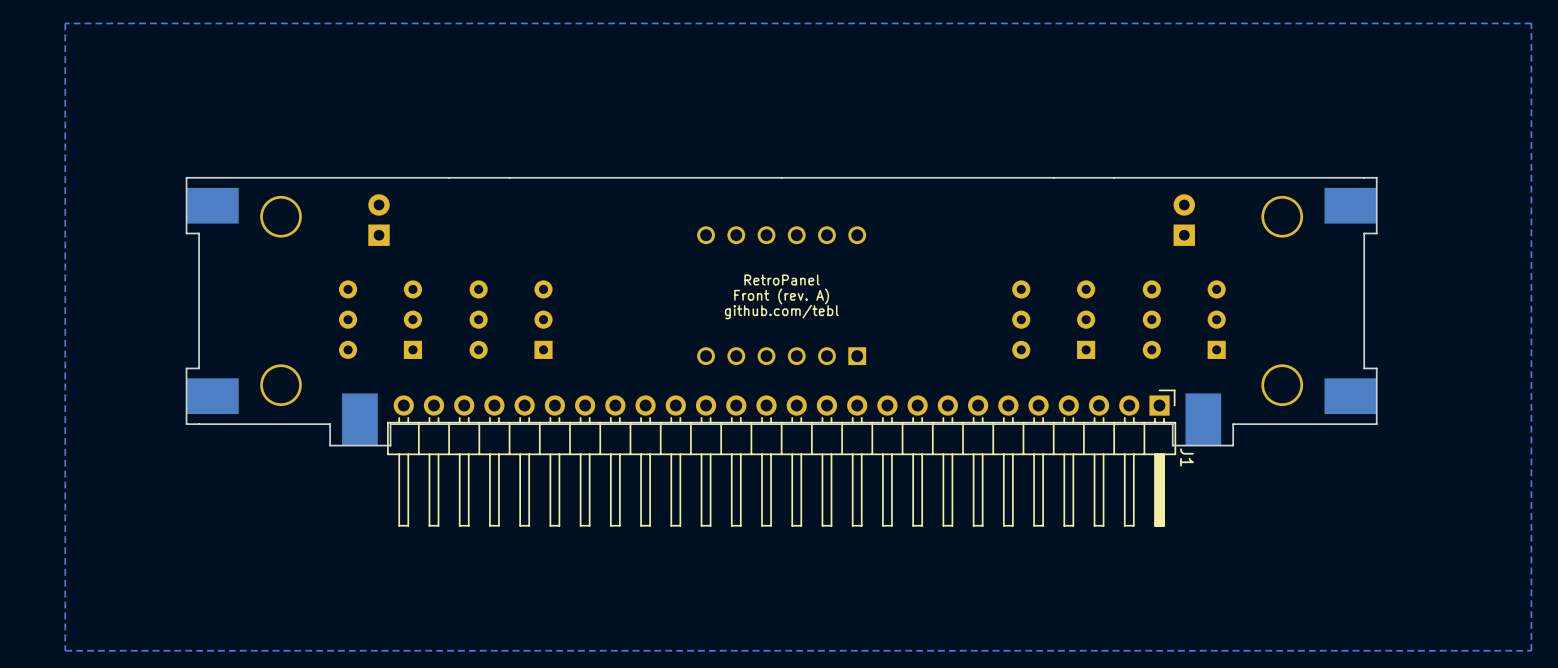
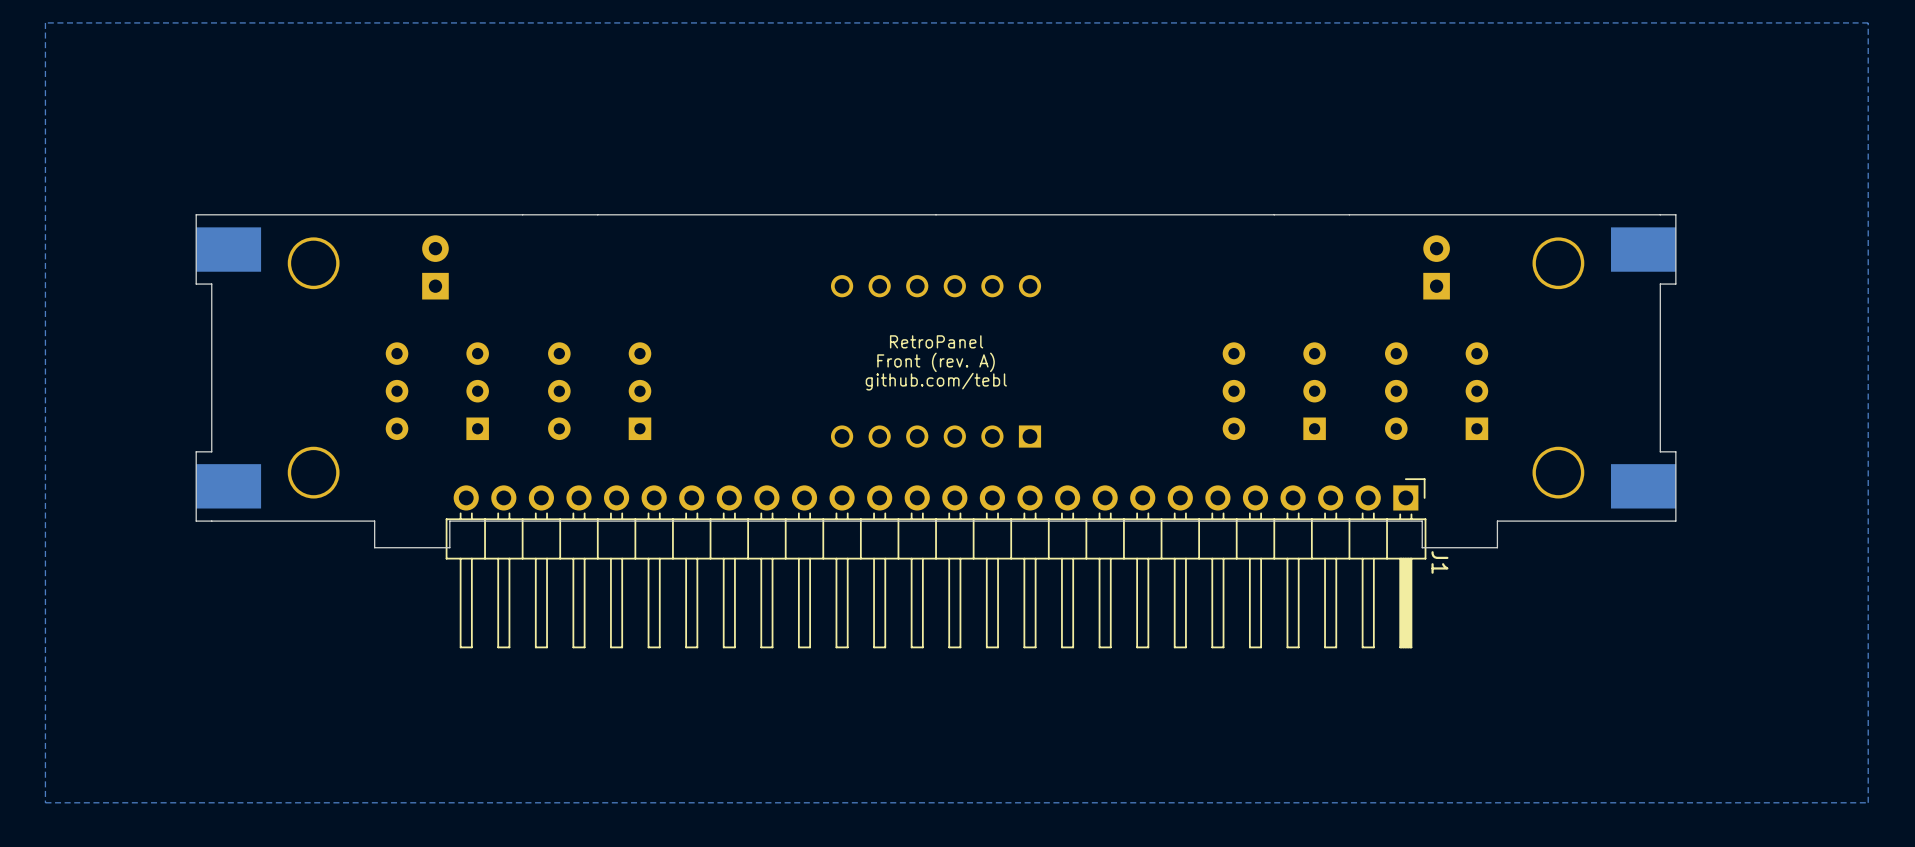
part: (359, 419) -> none
part: (1203, 419) -> none

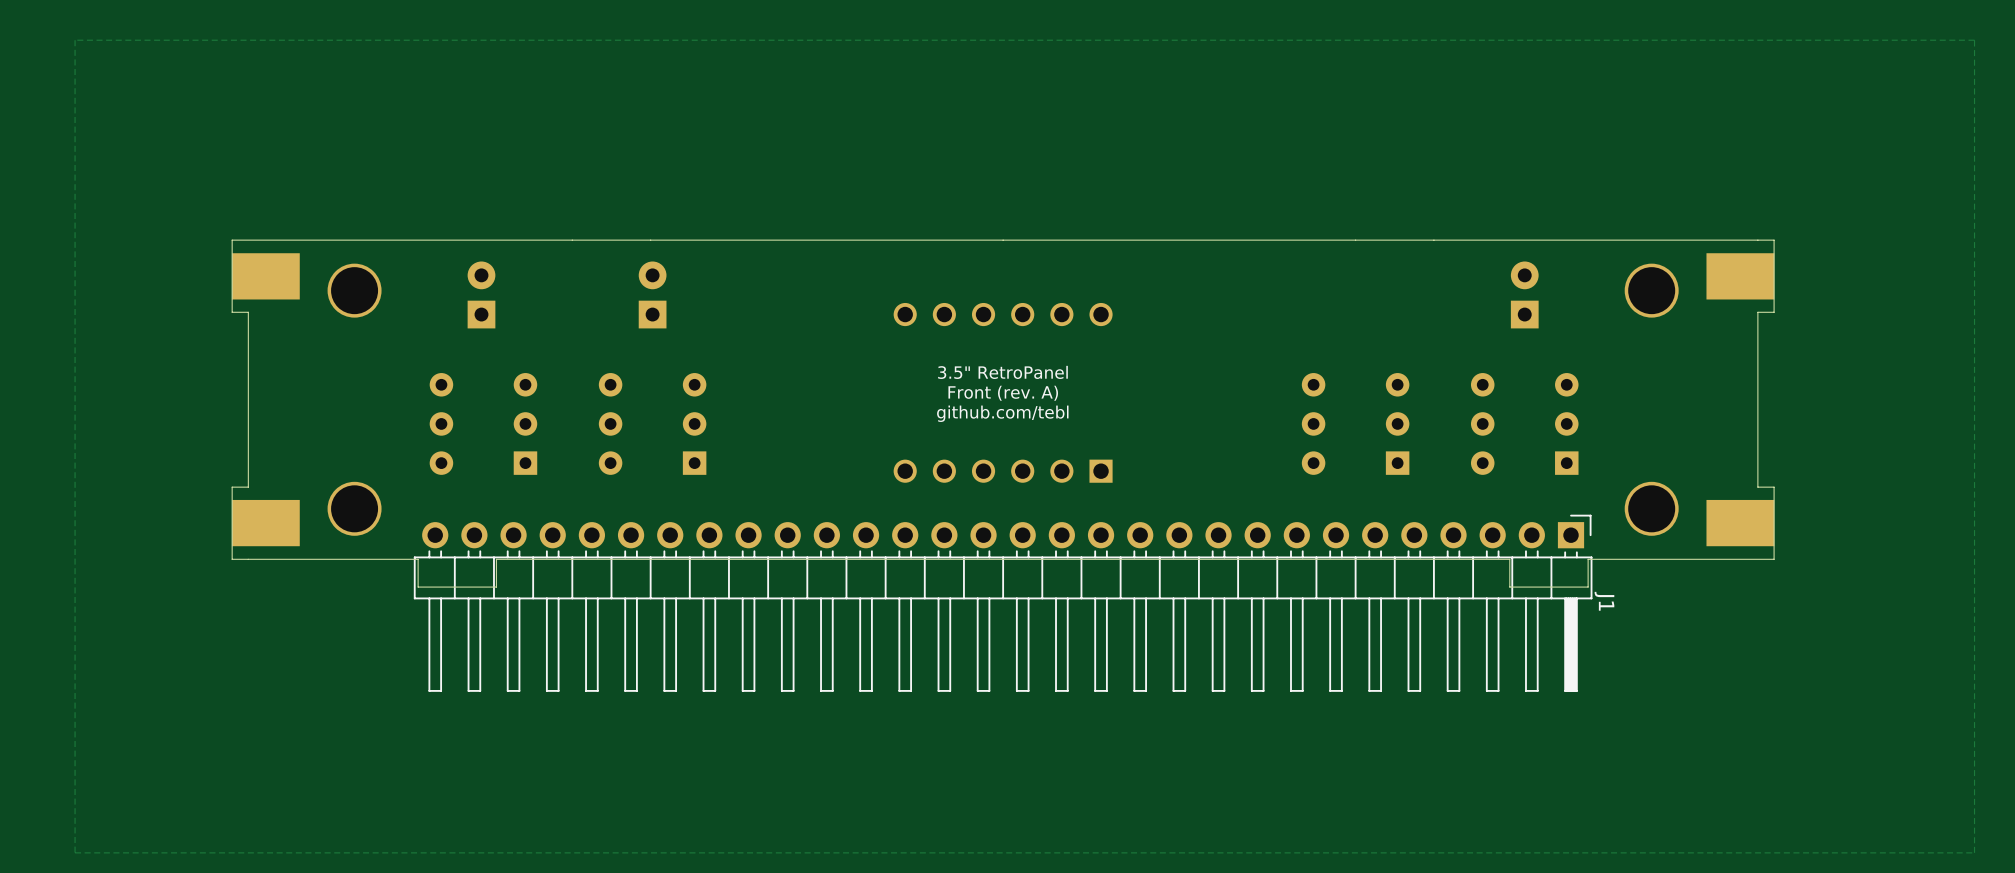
part: none -> (652, 294)
text: RetroPanel (936, 341) -> 3.5" RetroPanel (1002, 372)
J1 footprint: [445, 478, 1427, 649] -> [413, 514, 1593, 692]
J1 name position: J1 (1439, 562) -> J1 (1604, 601)

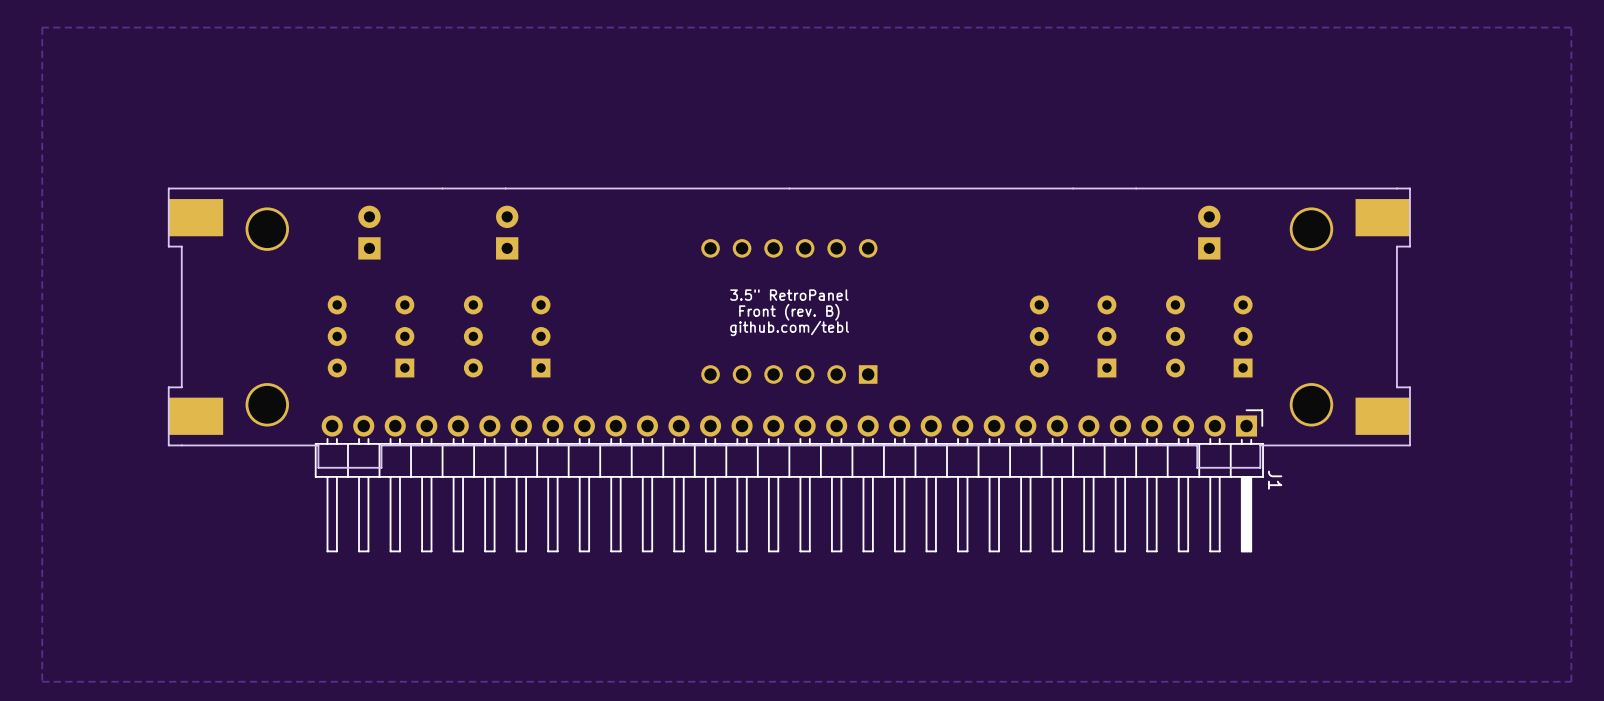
text: Front (rev. A) (1003, 393) -> Front (rev. B) (789, 312)

